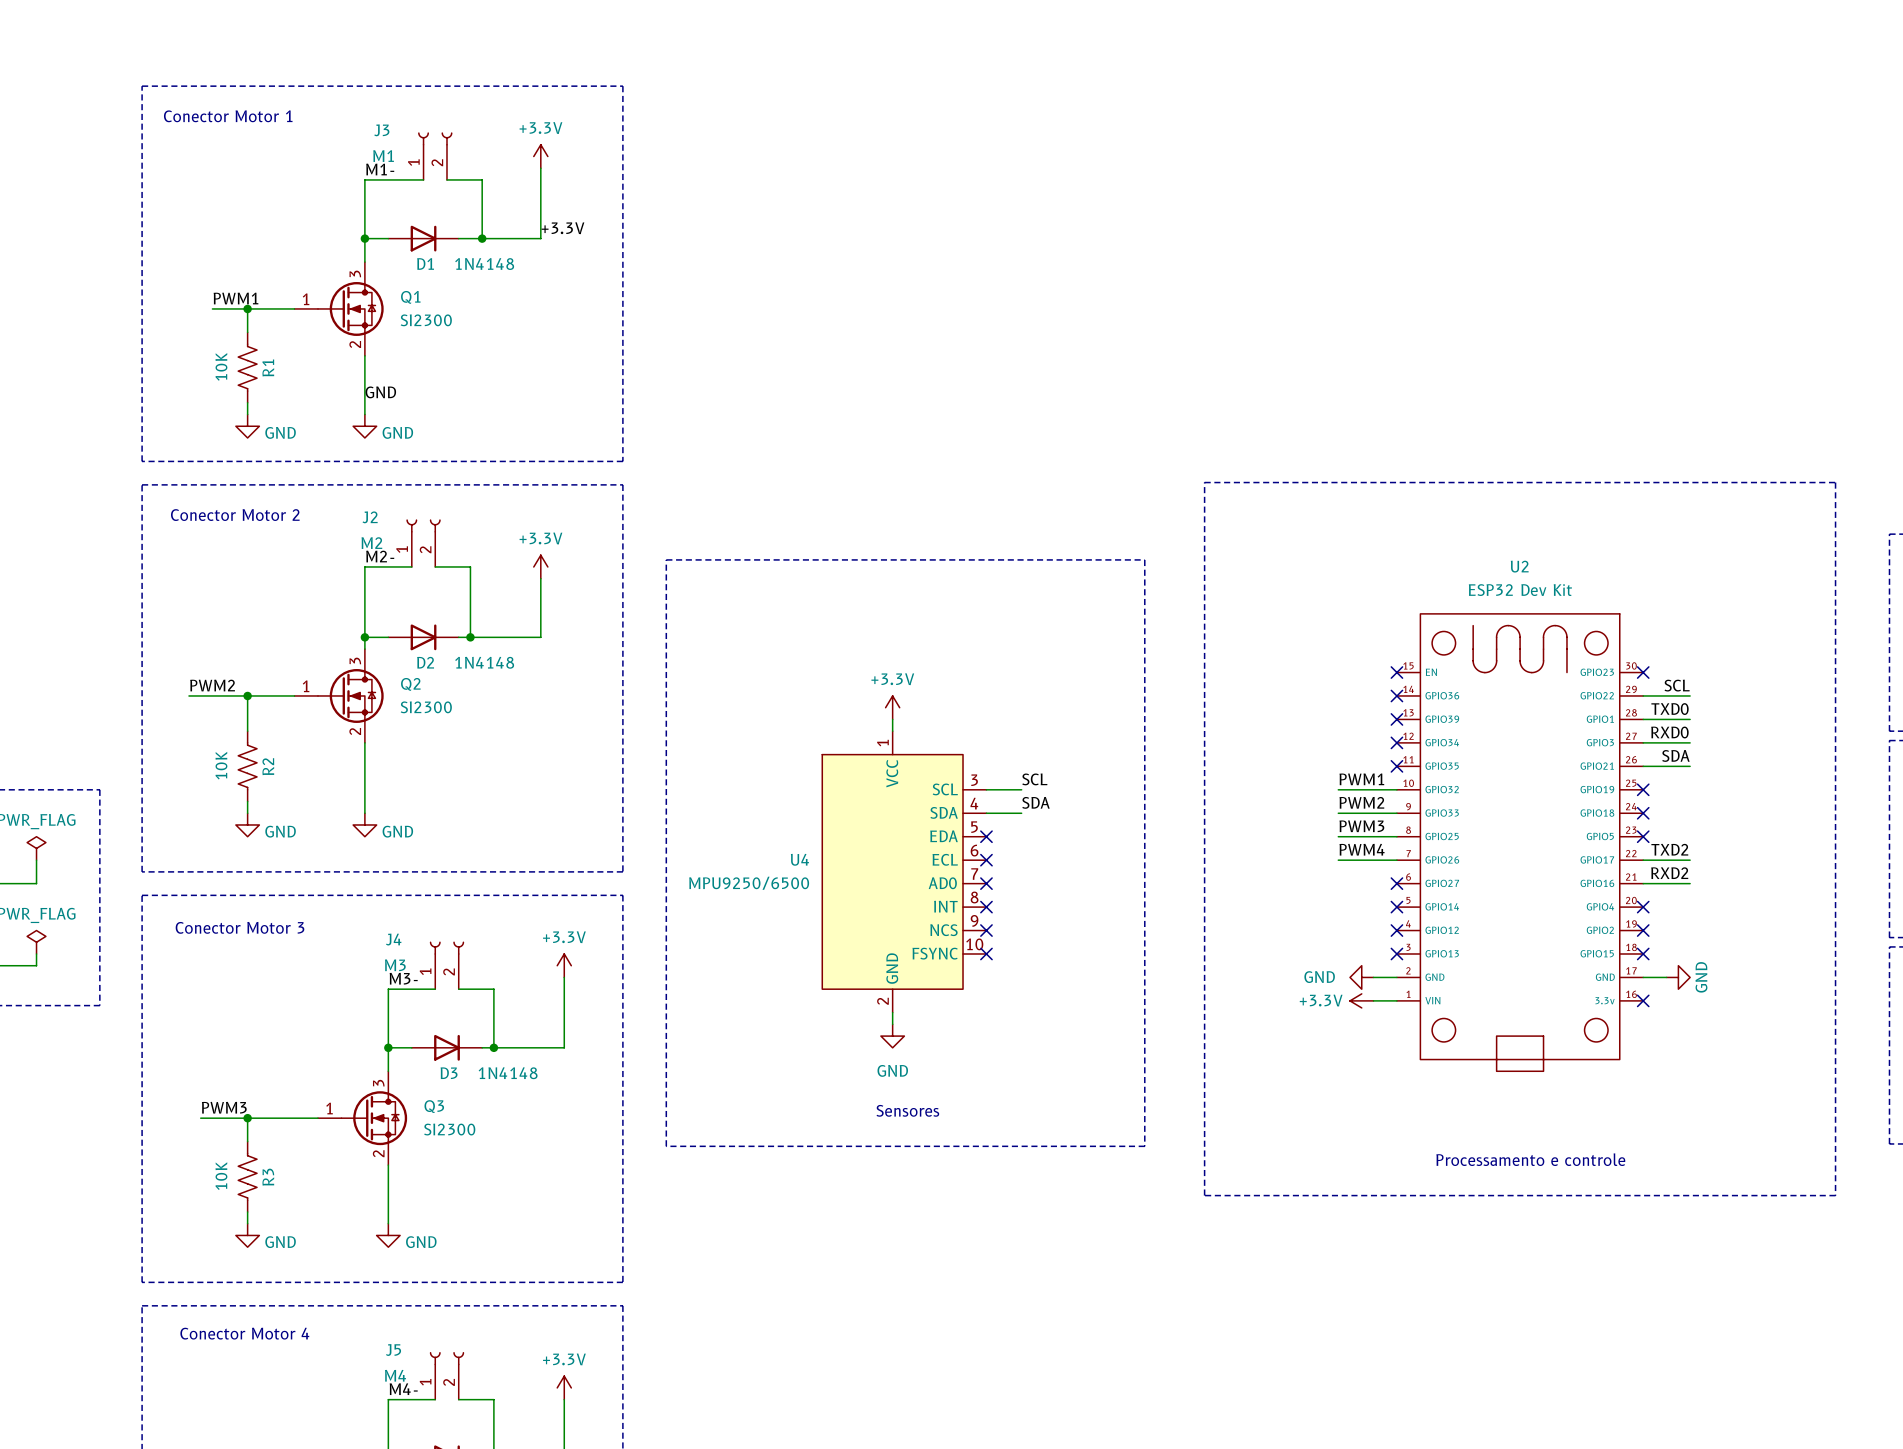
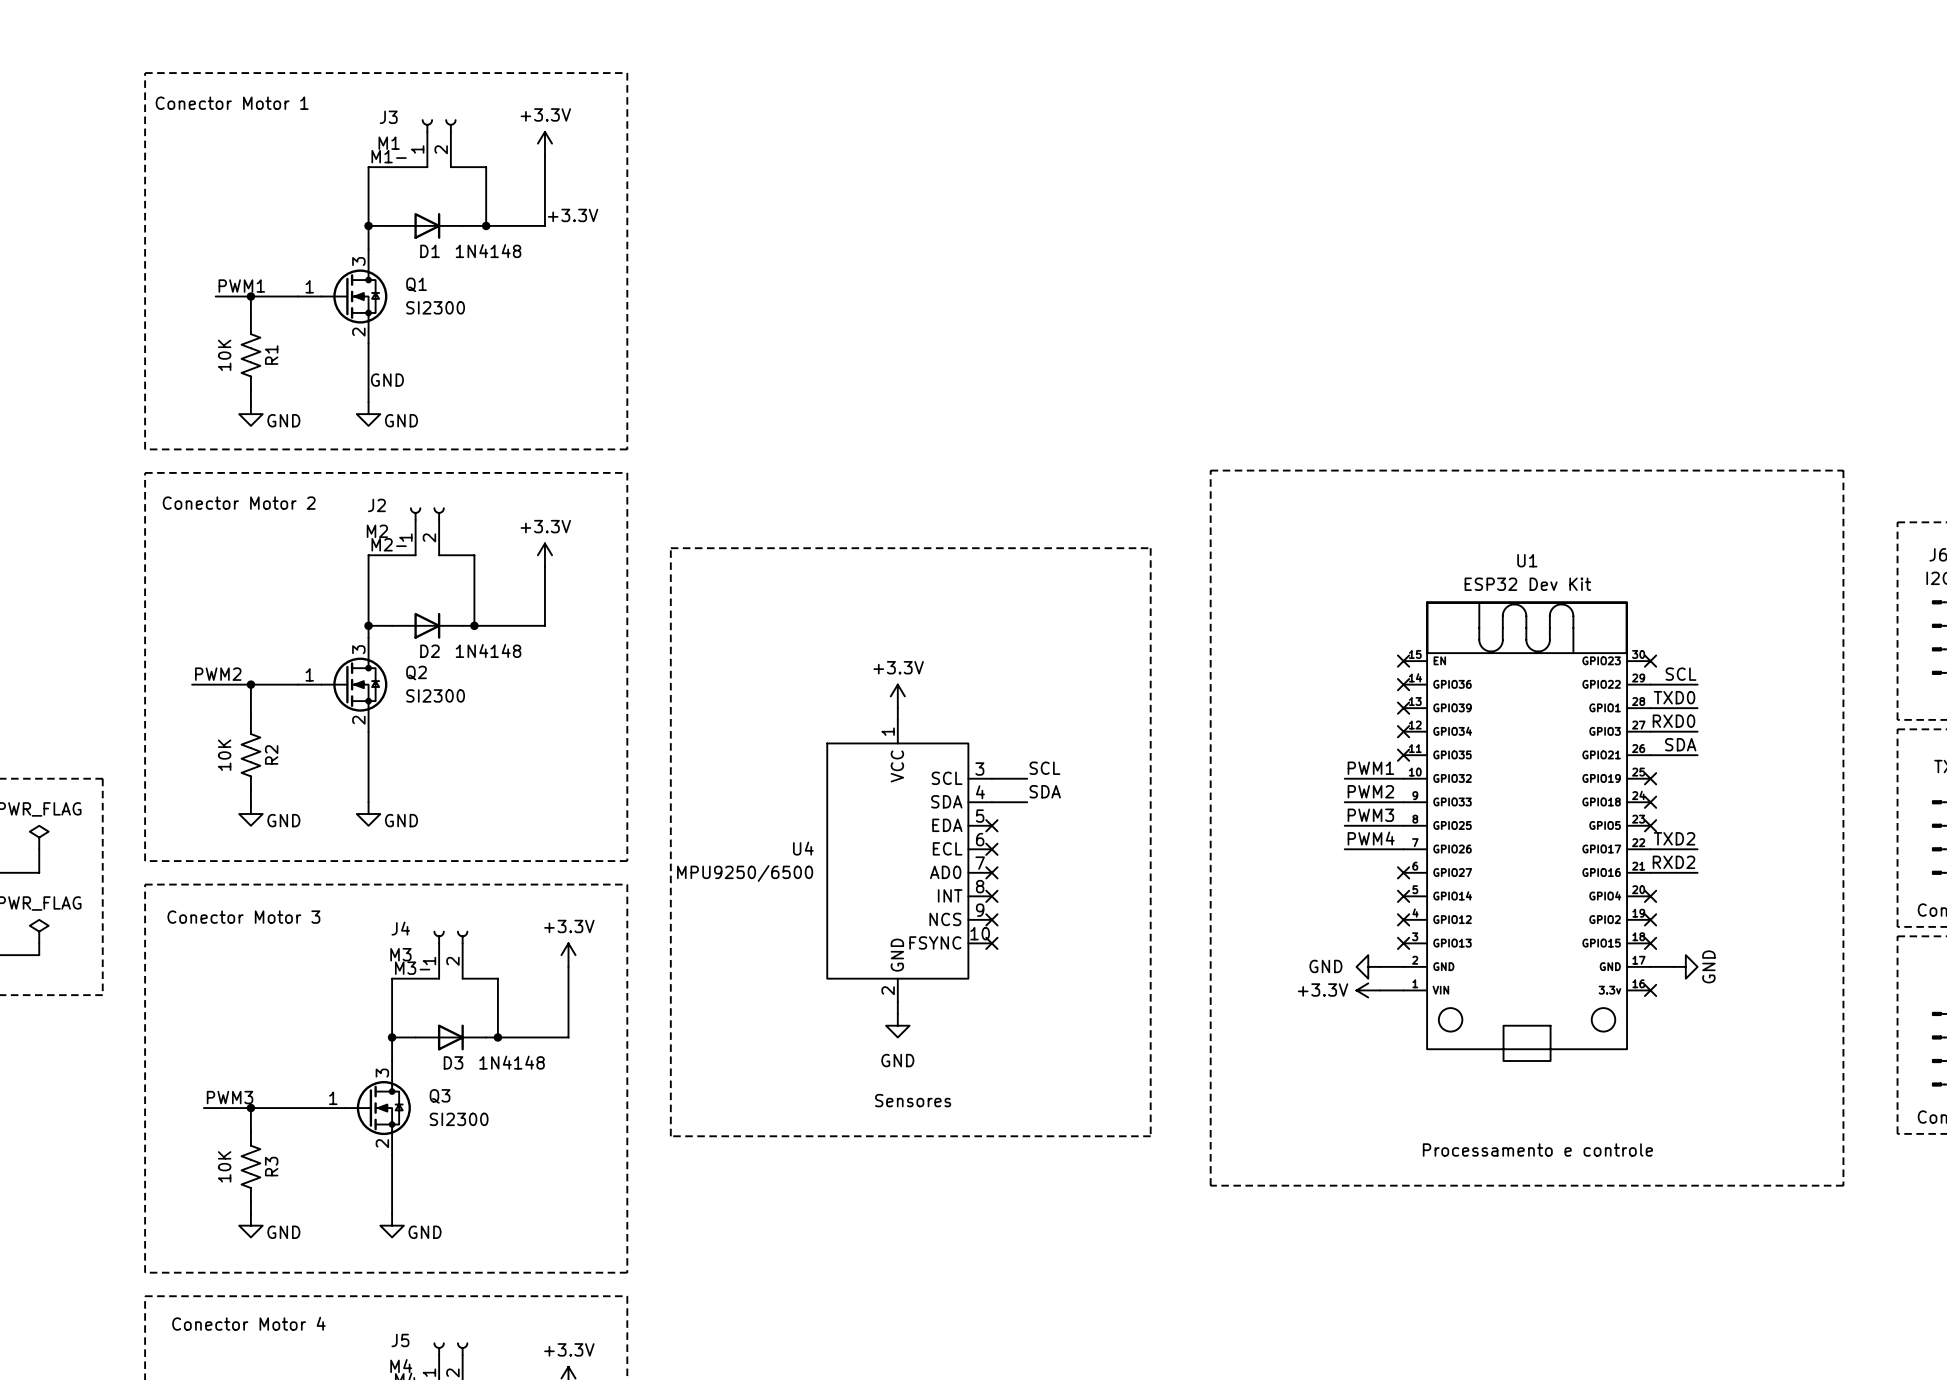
U2: ESP32 Dev Kit (1520, 842) -> none
U1: none -> ESP32 Dev Kit (1527, 831)

